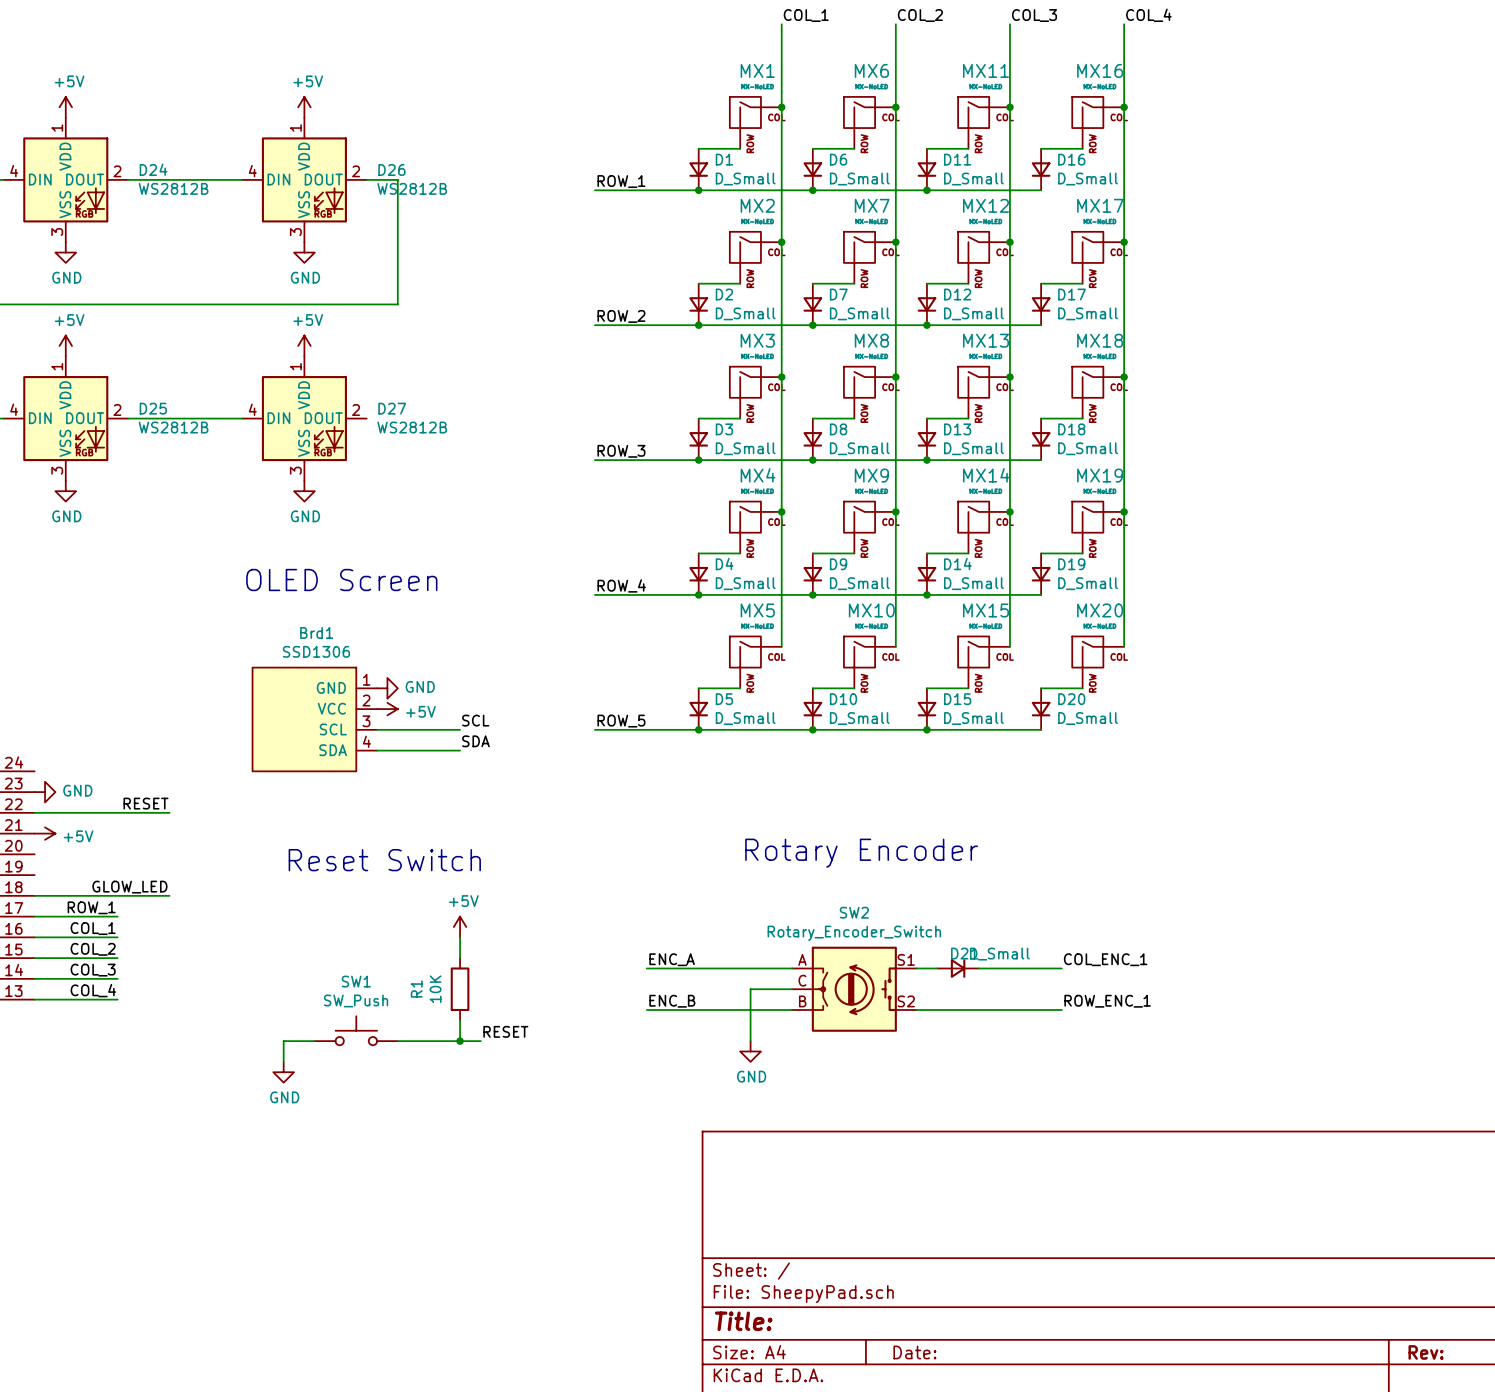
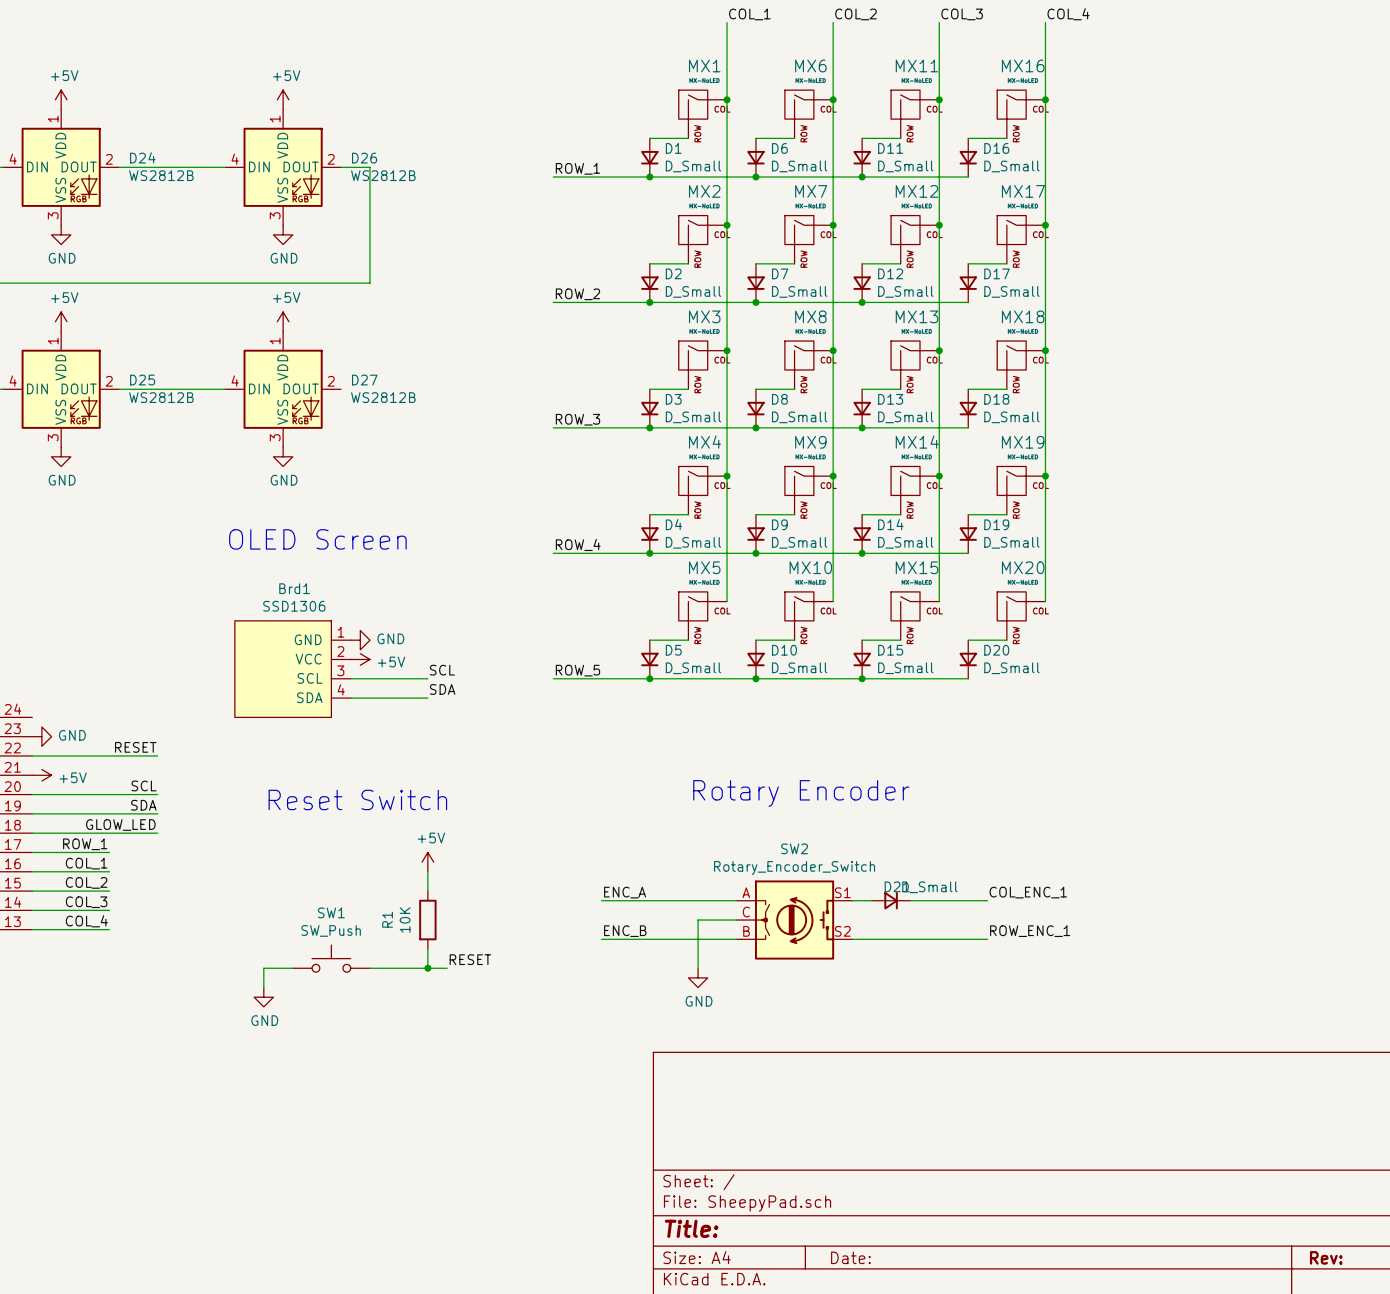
label: none -> SCL (144, 785)
wire: none -> (32, 794) (157, 794)
label: none -> SDA (143, 805)
wire: none -> (32, 813) (157, 813)

